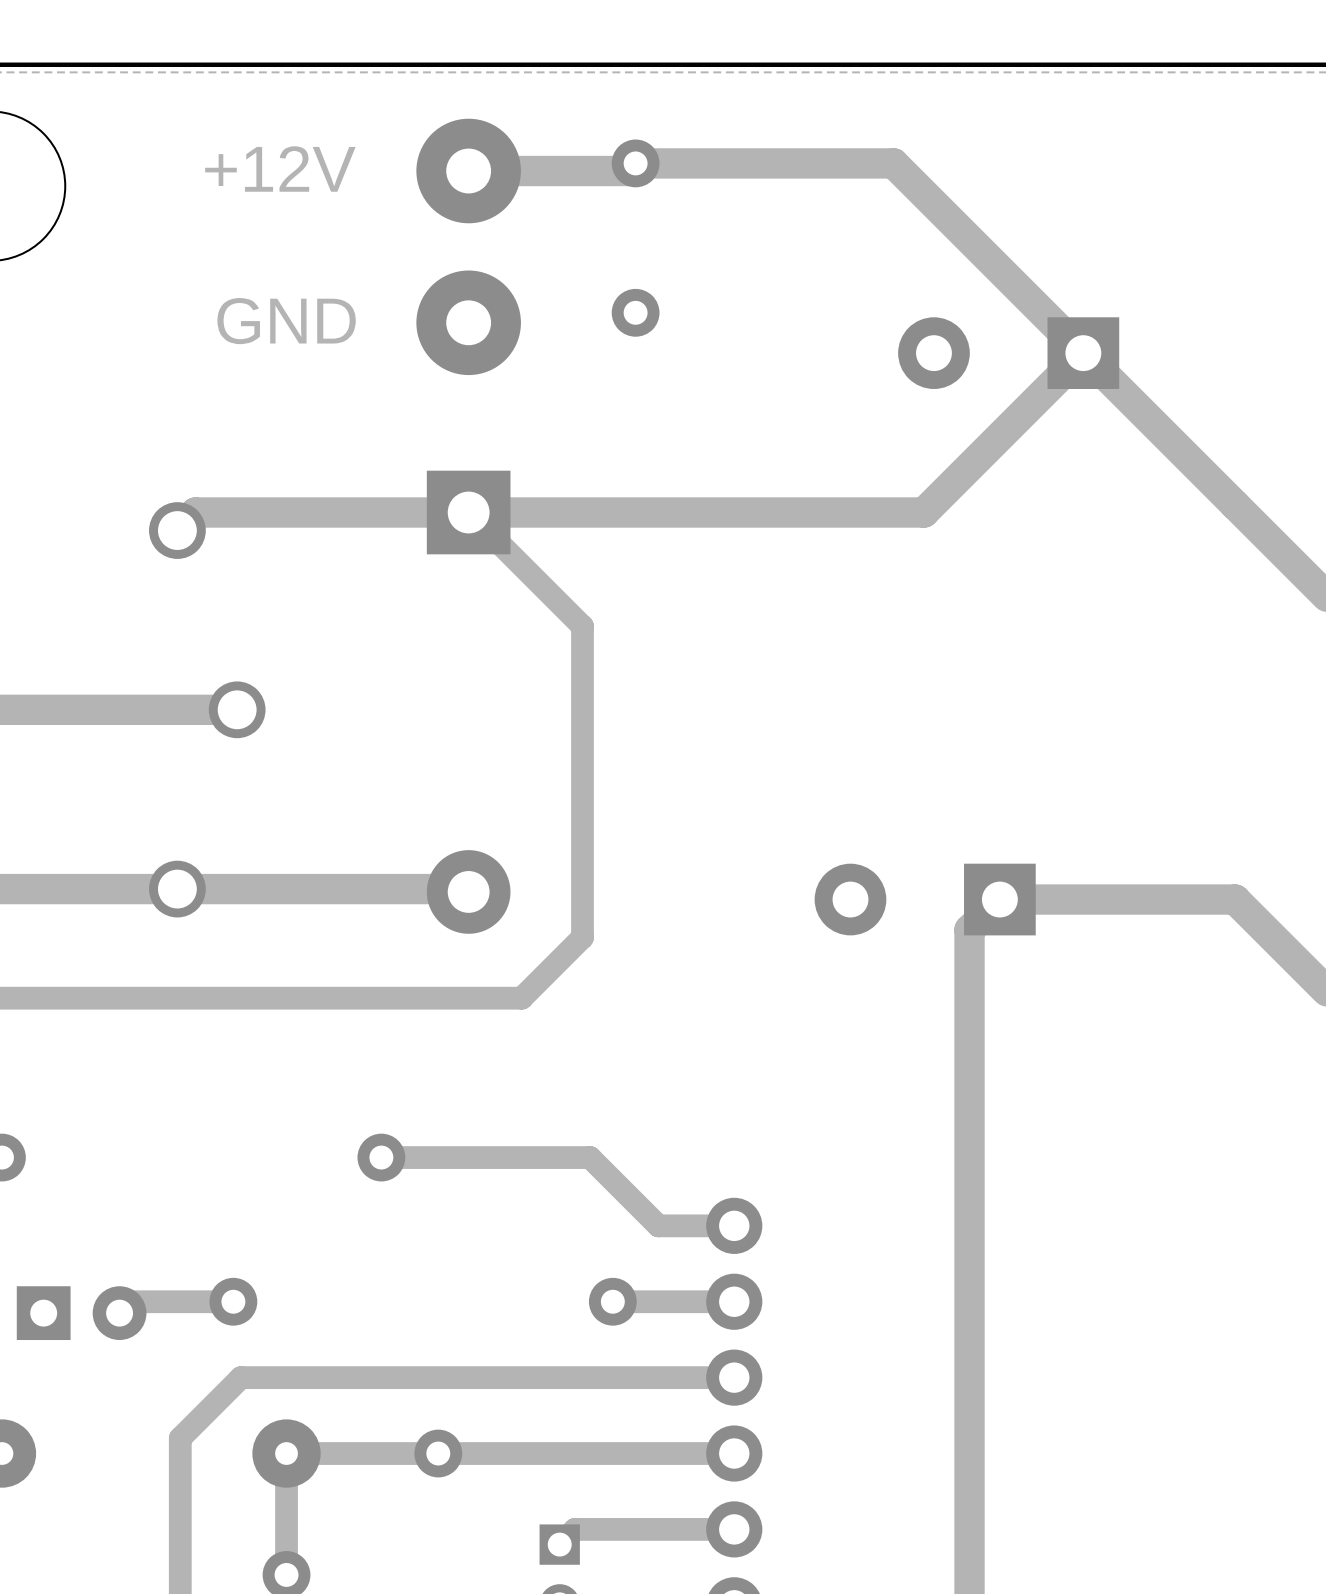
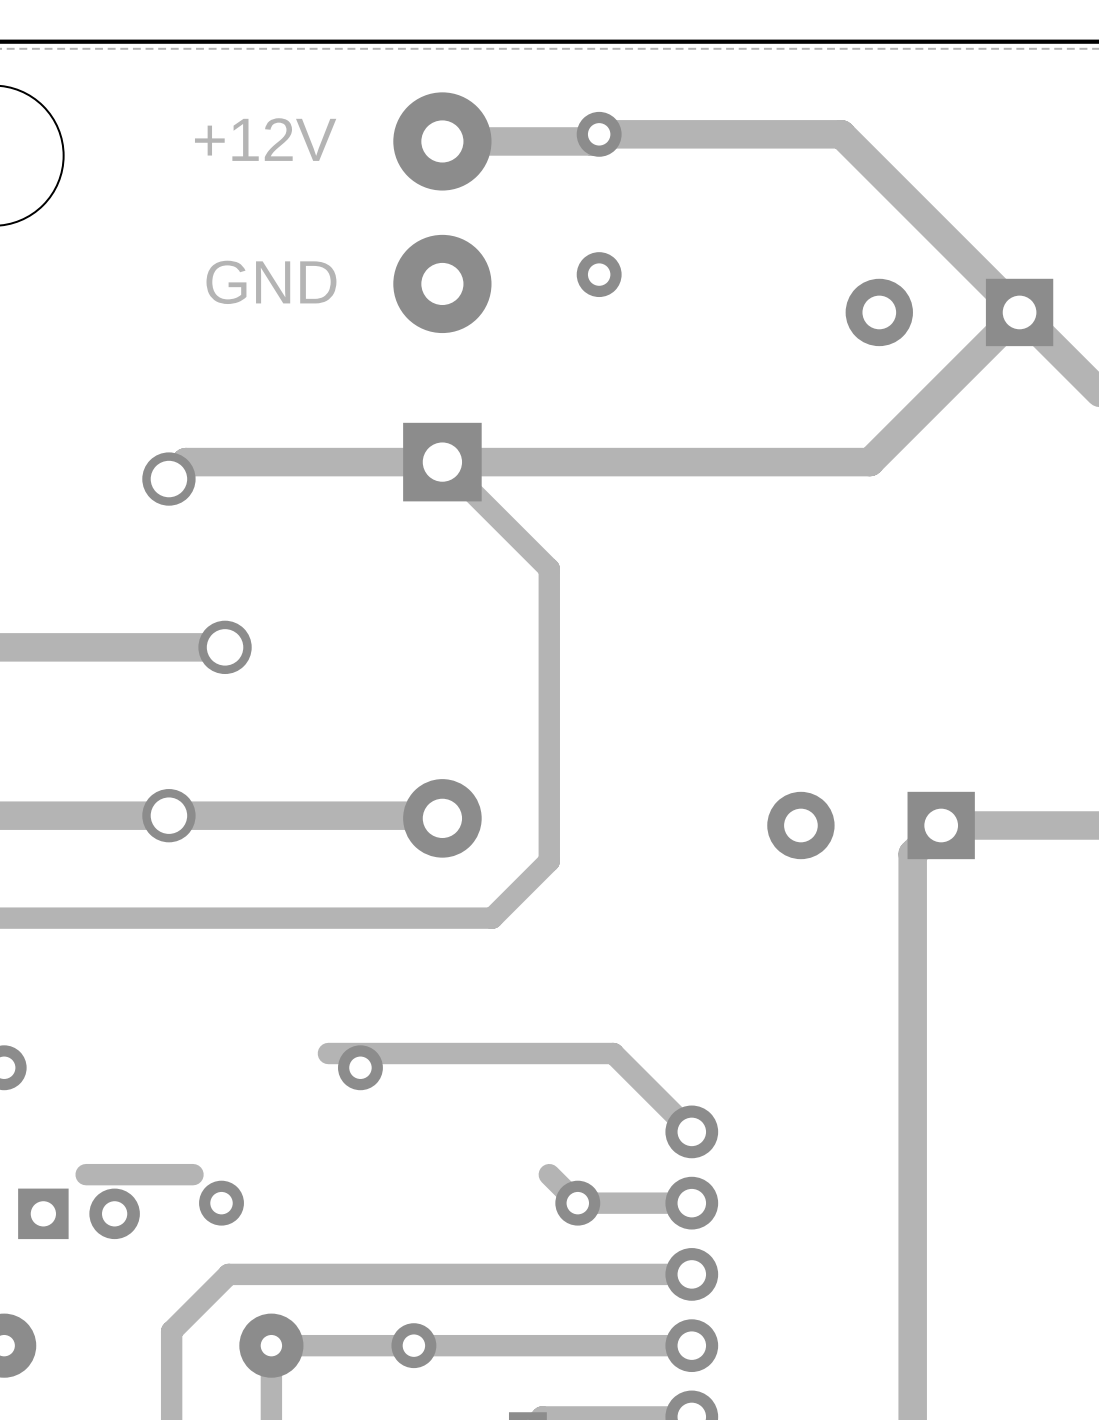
track: (381, 1157) (590, 1157) (658, 1225) (734, 1225) -> (328, 1053) (613, 1053) (691, 1131)
track: none -> (193, 1174) (86, 1174)
track: none -> (549, 1174) (577, 1203)
track: (233, 1301) (130, 1301) (119, 1313) -> none

